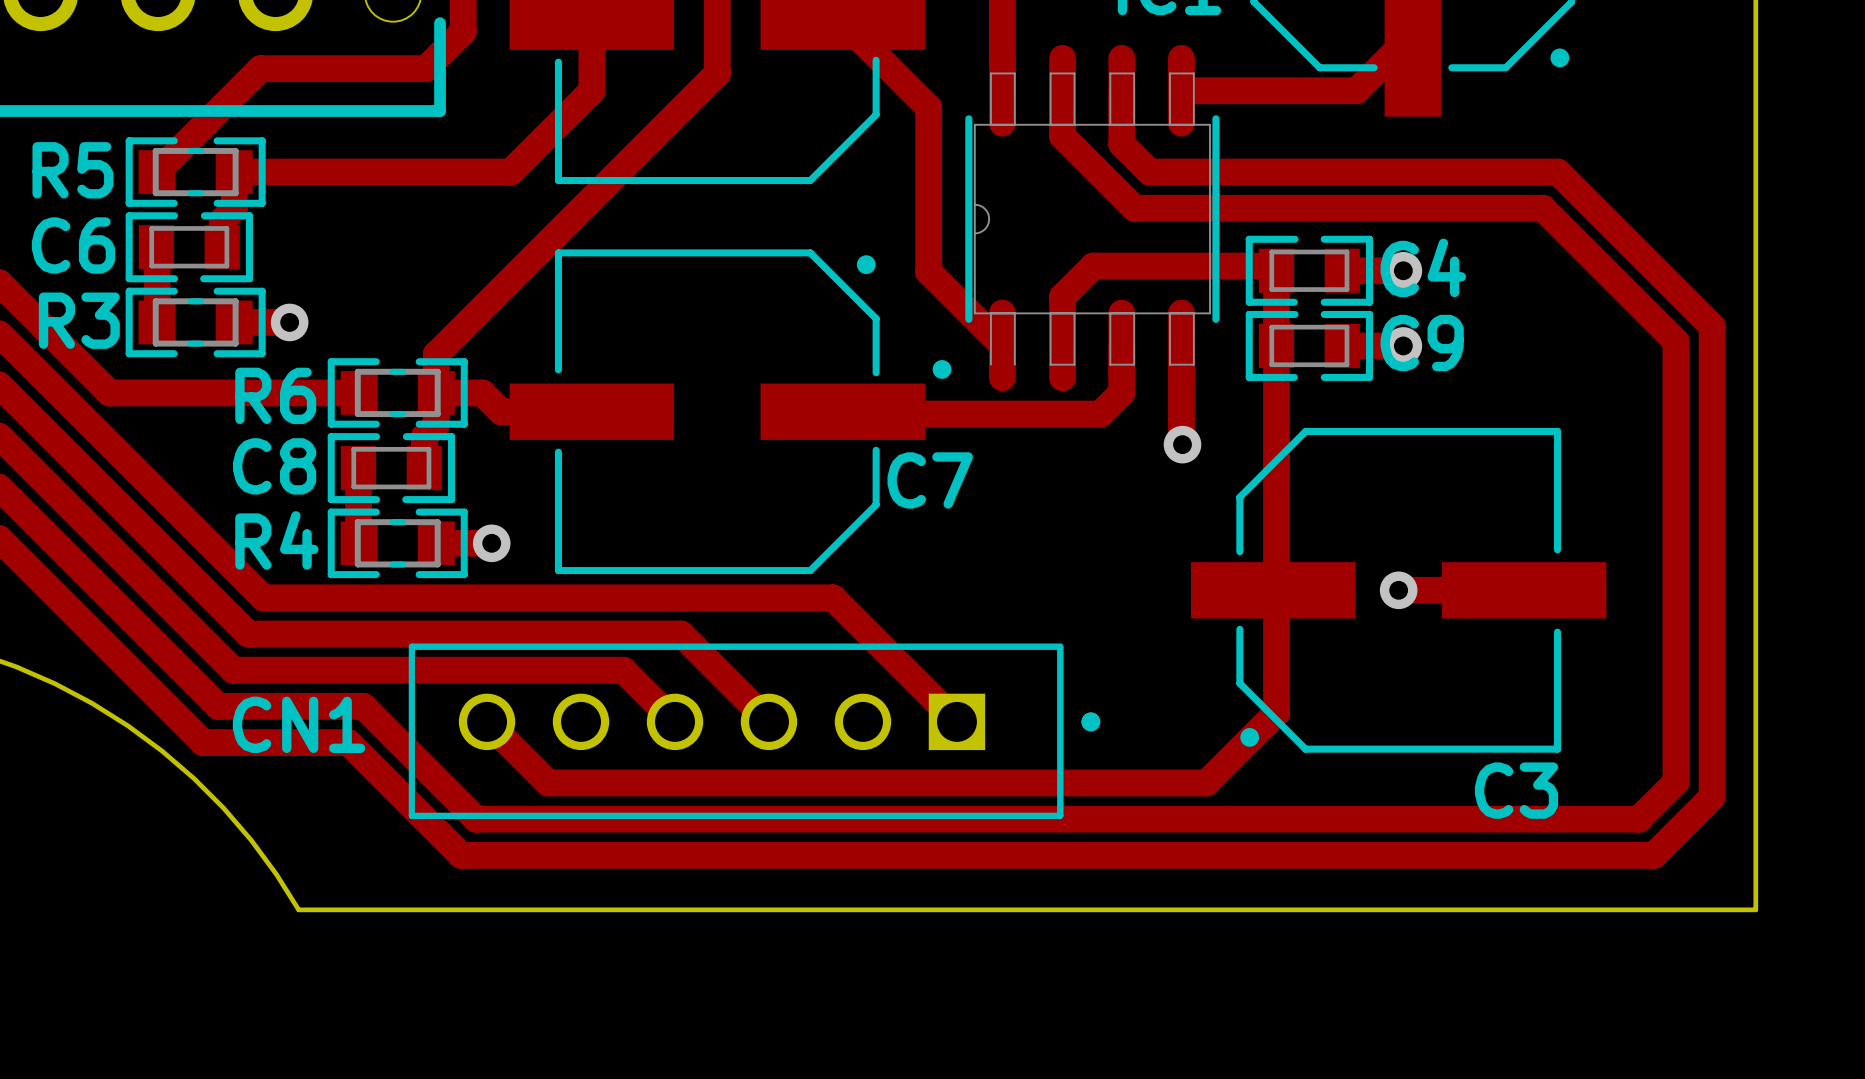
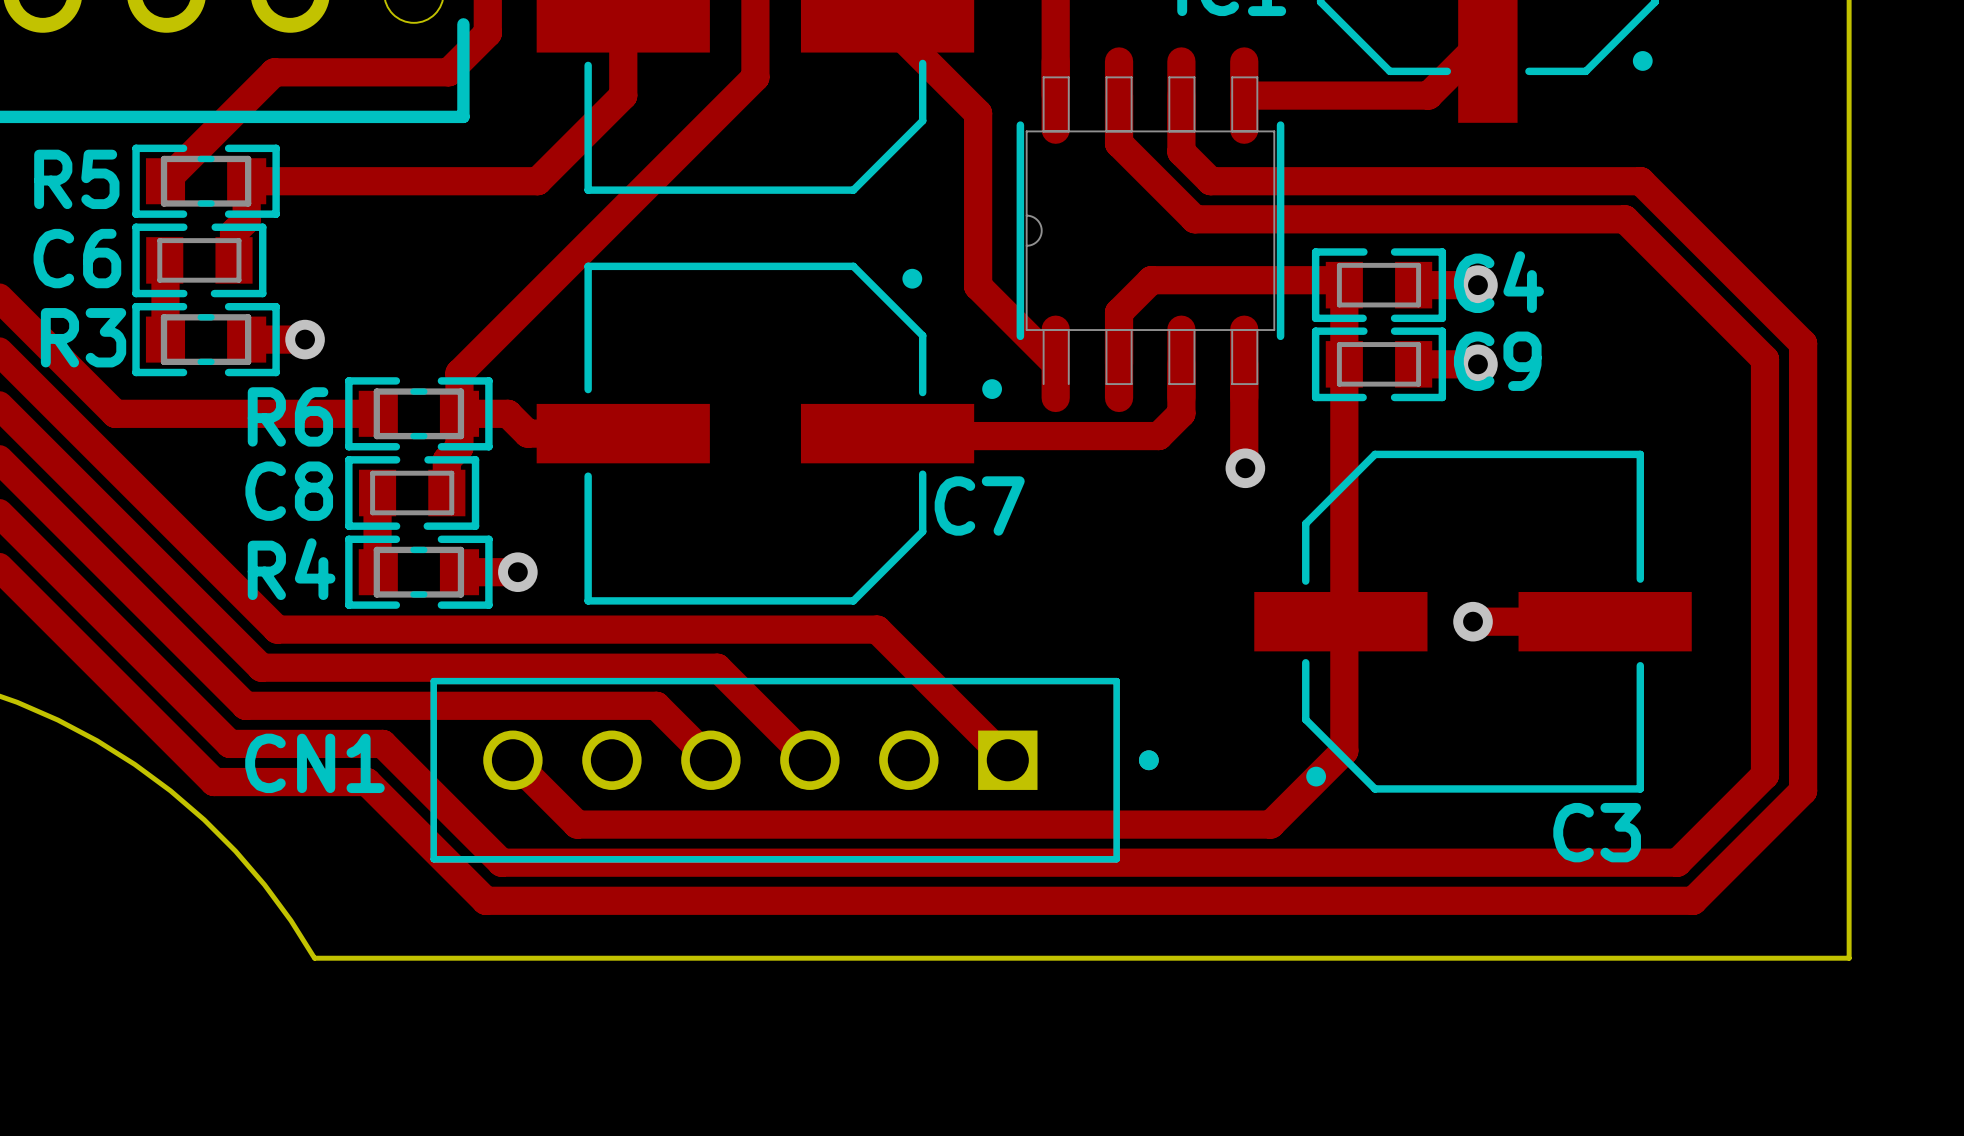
track: (1675, 735) (1675, 782) (1638, 819) (1592, 819) -> (1765, 775) (1677, 862)
track: (1712, 750) (1712, 797) (1653, 855) (1607, 855) -> (1803, 790) (1693, 900)

